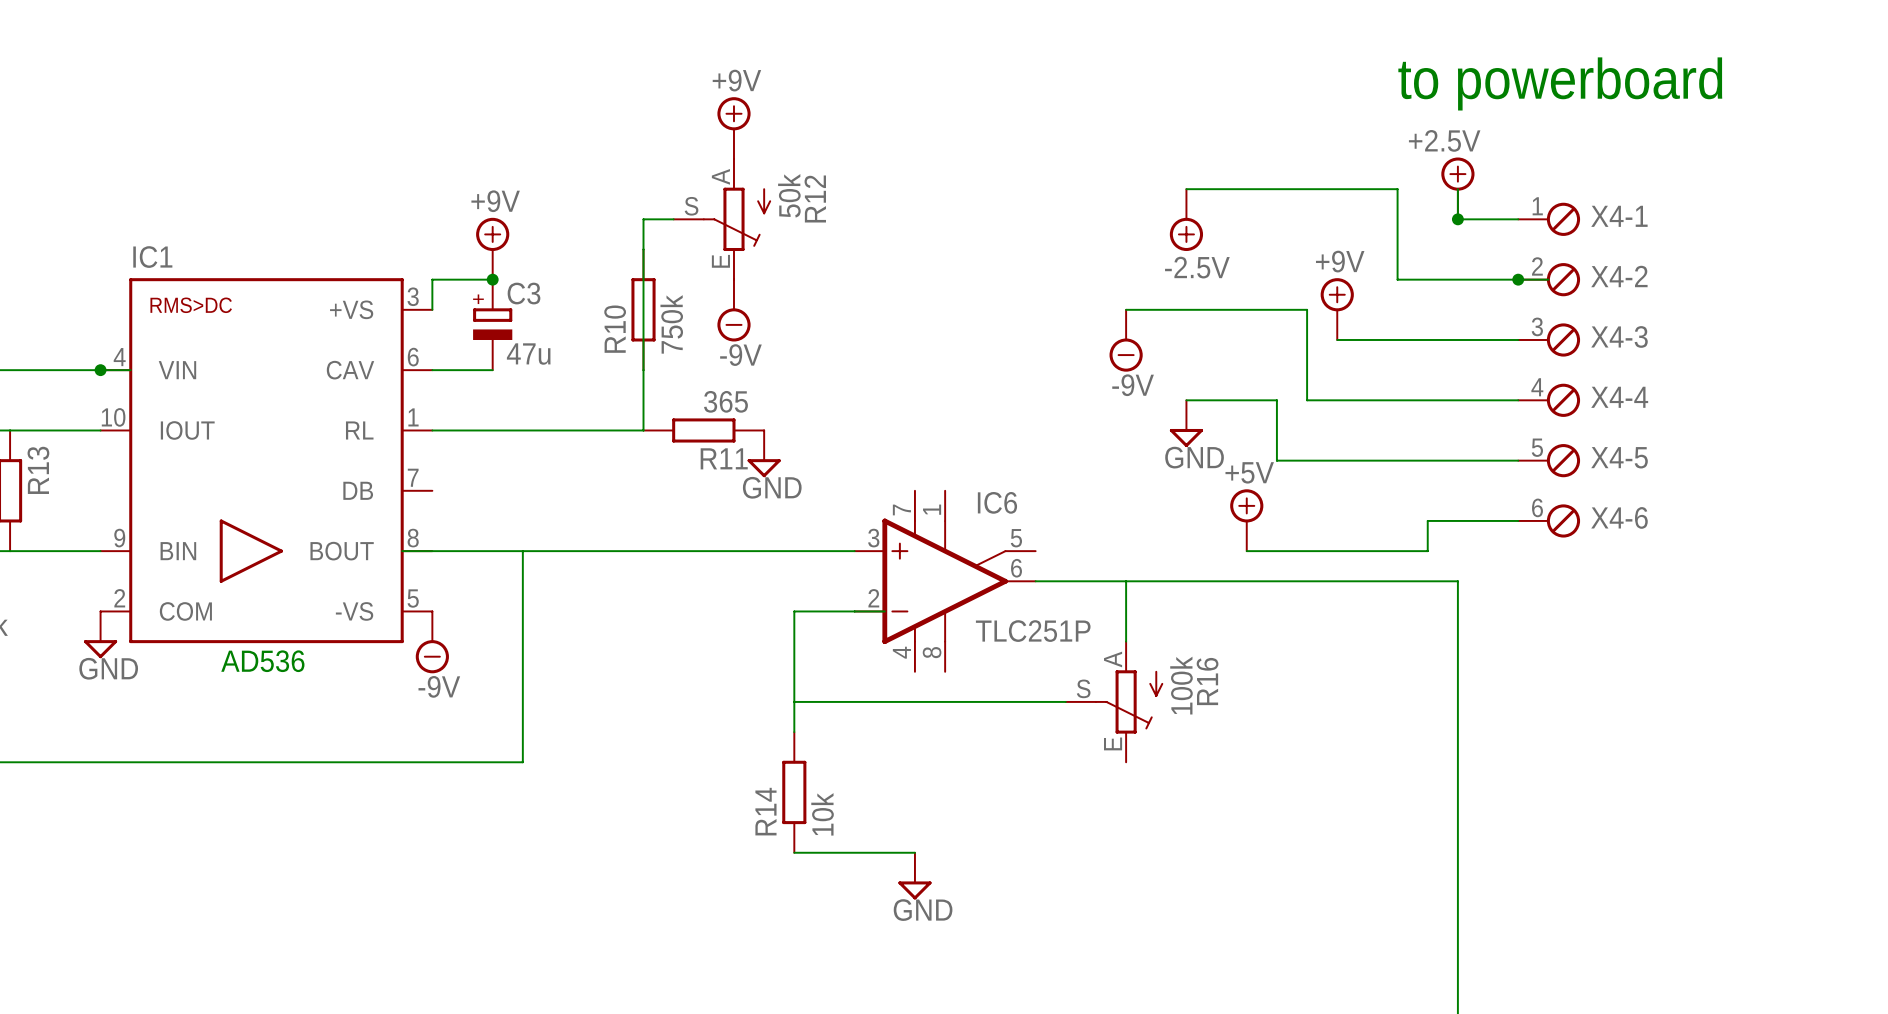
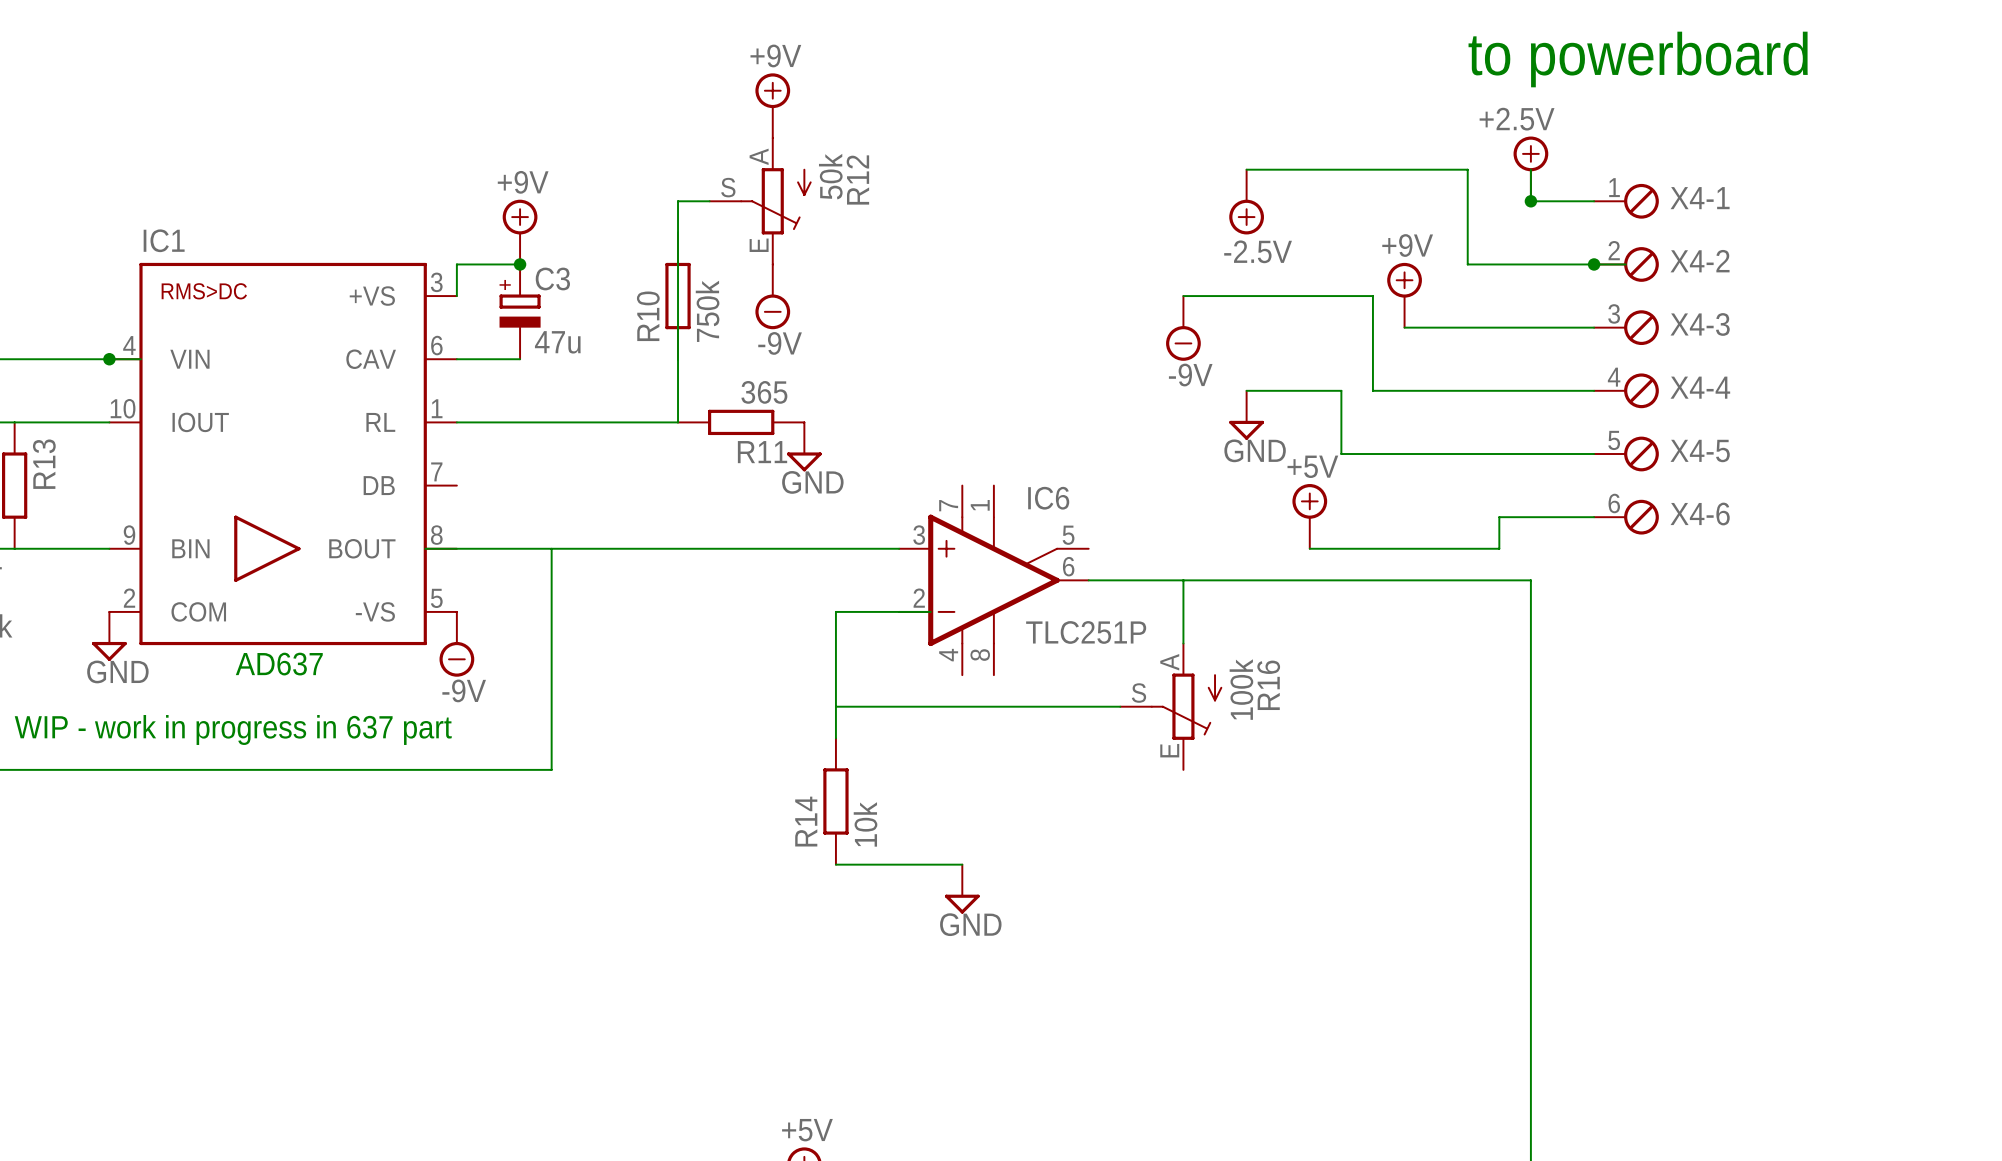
text: AD536 (262, 661) -> AD637 (279, 664)
text: none -> WIP - work in progress in 637 part (233, 729)

